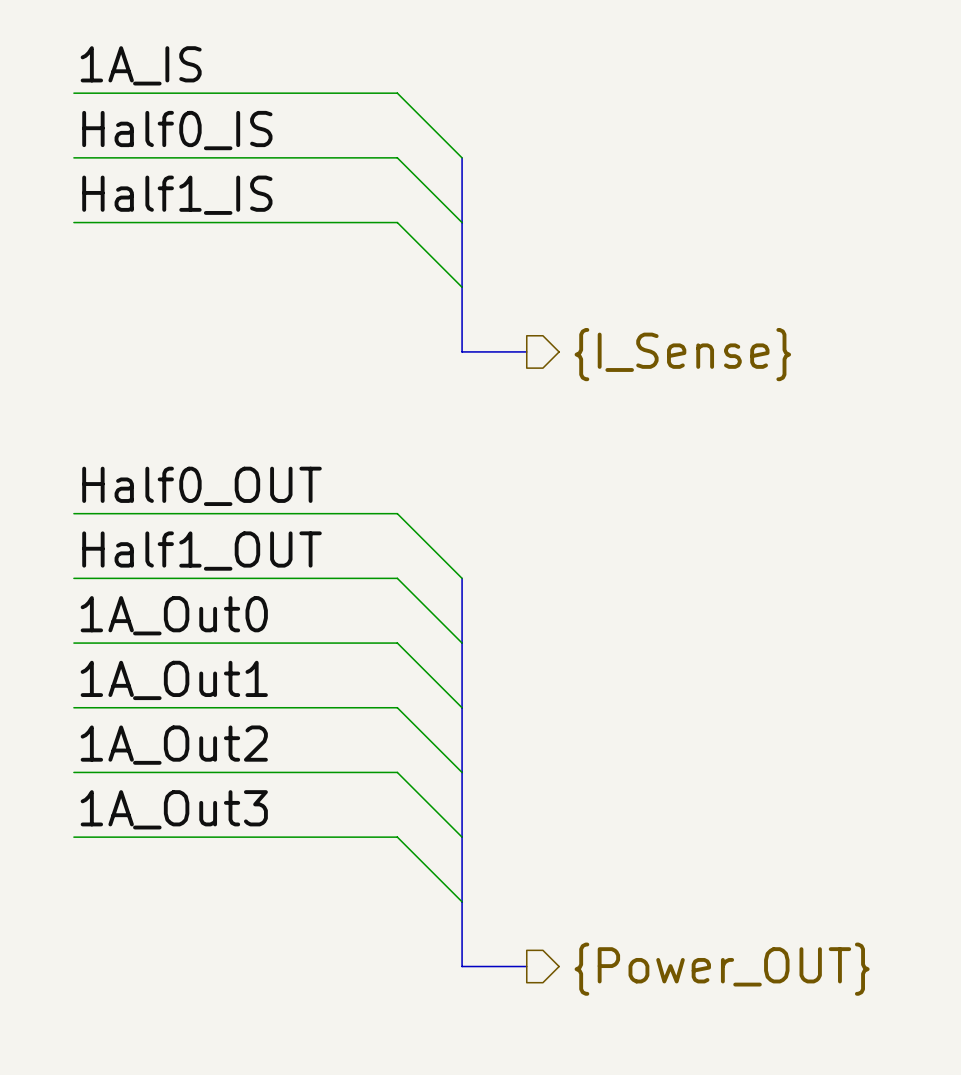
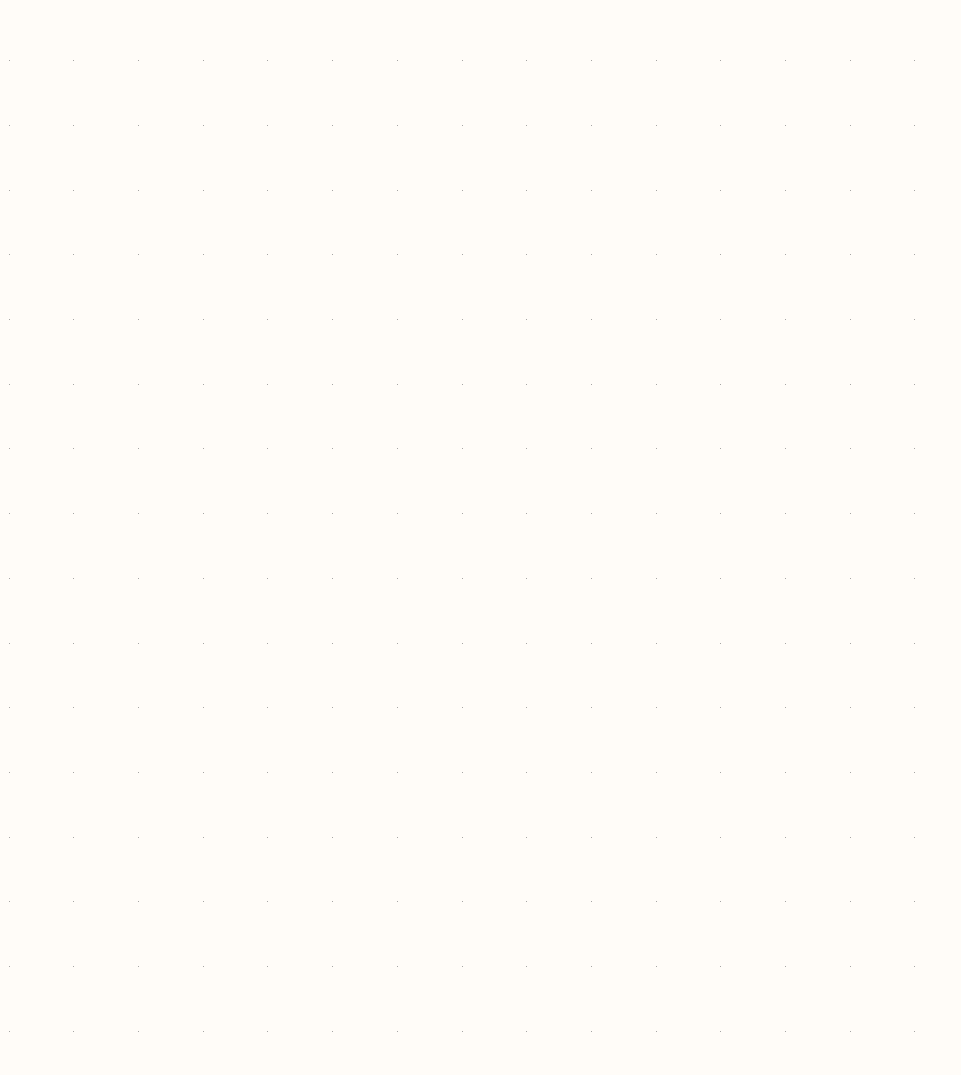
label: 1A_IS (141, 65) -> none
wire: (73, 93) (397, 93) (462, 157) -> none
label: Half0_IS (177, 130) -> none
wire: (73, 157) (397, 157) (462, 222) -> none
bus: (462, 157) (462, 351) (526, 351) -> none
label: Half1_IS (177, 195) -> none
wire: (73, 222) (397, 222) (462, 287) -> none
hierarchical label: {I_Sense} (682, 354) -> none
label: Half0_OUT (202, 486) -> none
wire: (73, 513) (397, 513) (462, 578) -> none
label: Half1_OUT (202, 551) -> none
wire: (73, 578) (397, 578) (462, 643) -> none
bus: (462, 578) (462, 966) (526, 966) -> none
label: 1A_Out0 (174, 615) -> none
wire: (73, 643) (397, 643) (462, 707) -> none
label: 1A_Out1 (174, 680) -> none
wire: (73, 707) (397, 707) (462, 772) -> none
label: 1A_Out2 (174, 745) -> none
wire: (73, 772) (397, 772) (462, 837) -> none
label: 1A_Out3 (174, 809) -> none
wire: (73, 837) (397, 837) (462, 901) -> none
hierarchical label: {Power_OUT} (722, 969) -> none

